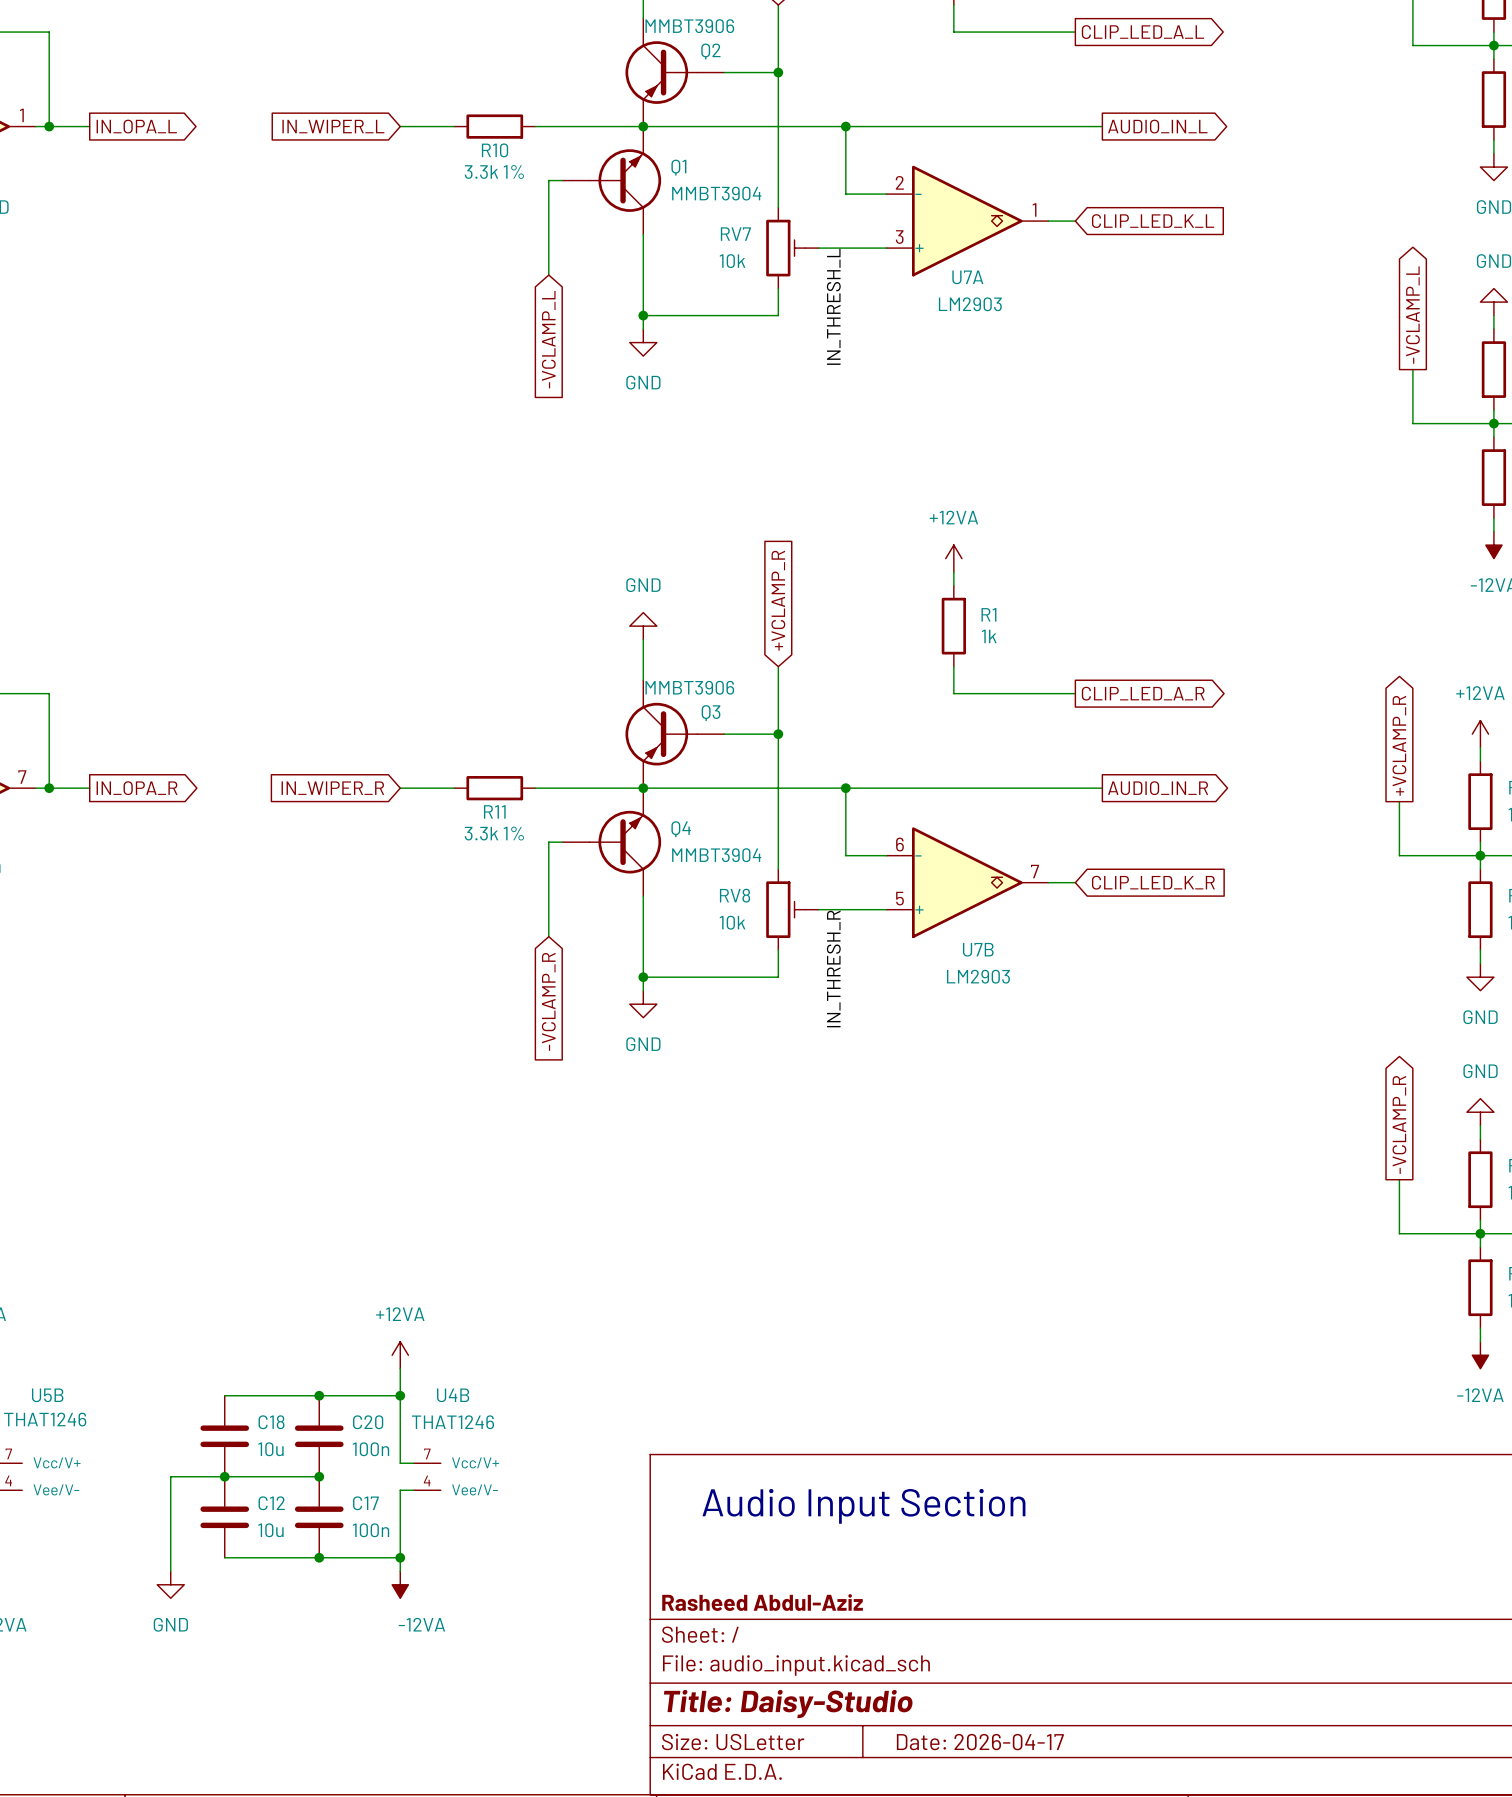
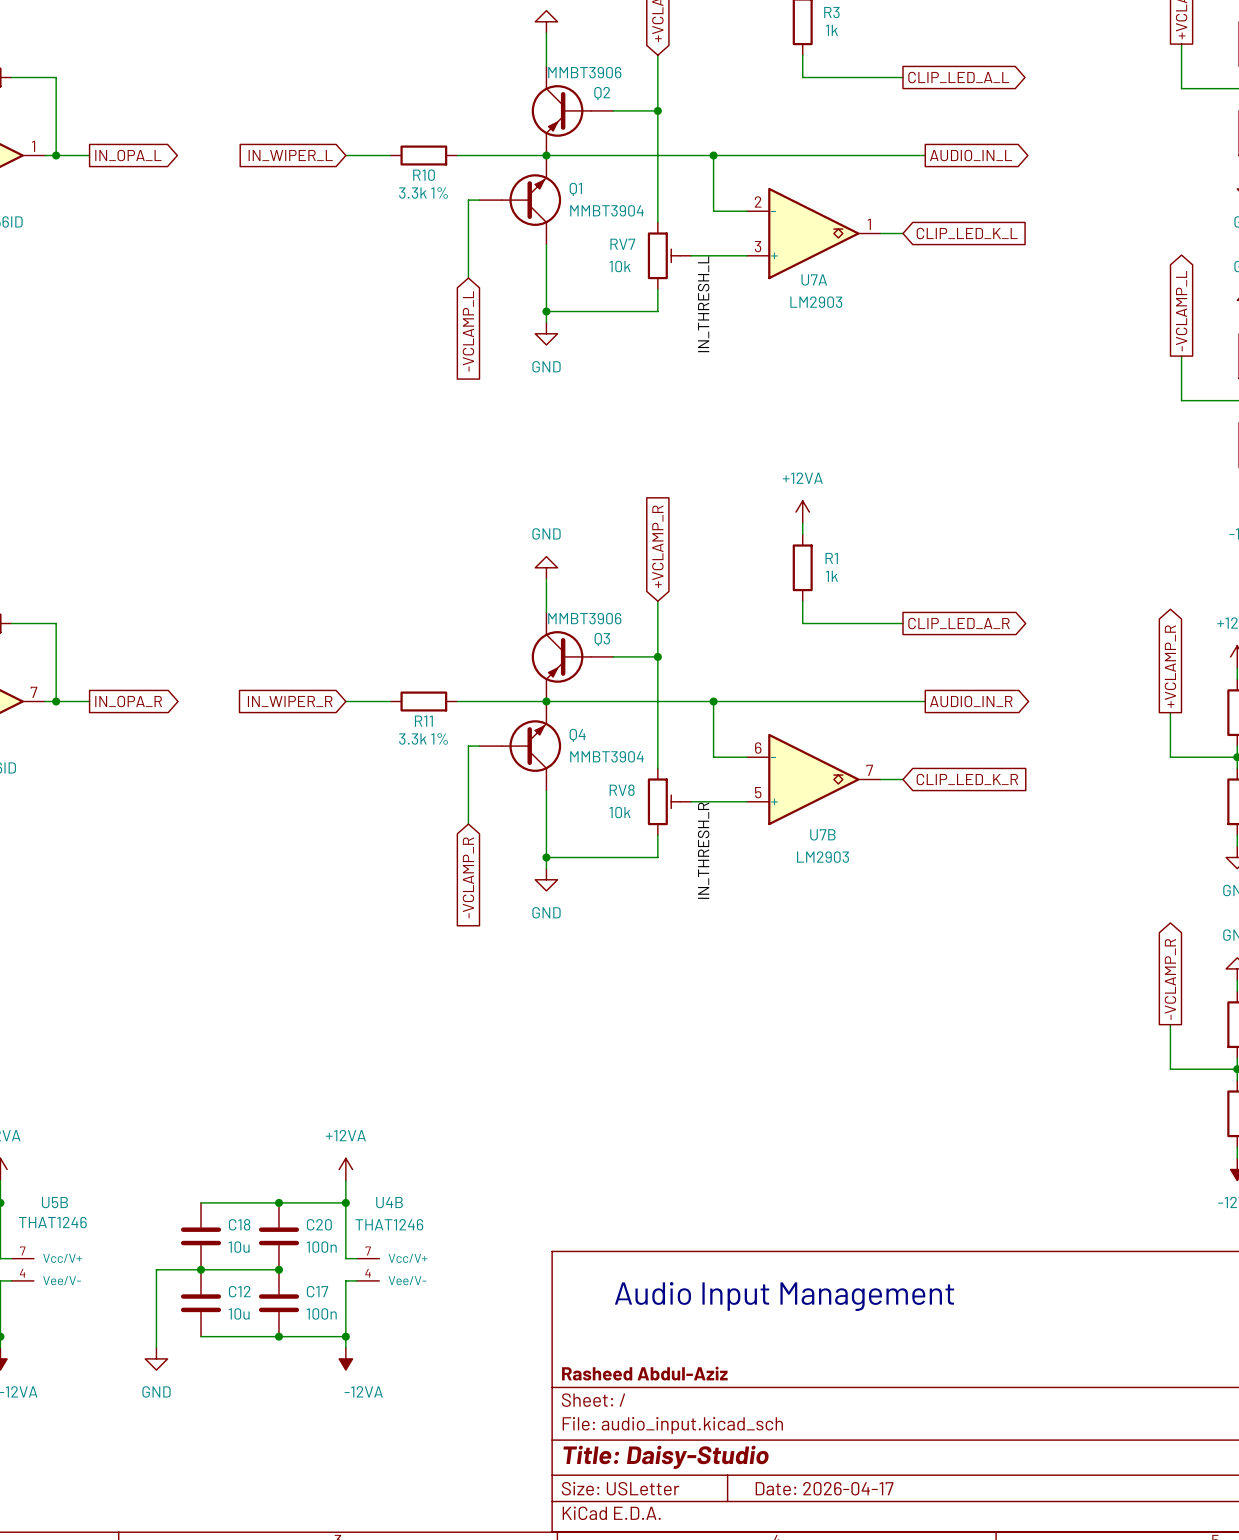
text: Audio Input Section (863, 1506) -> Audio Input Management (784, 1296)

